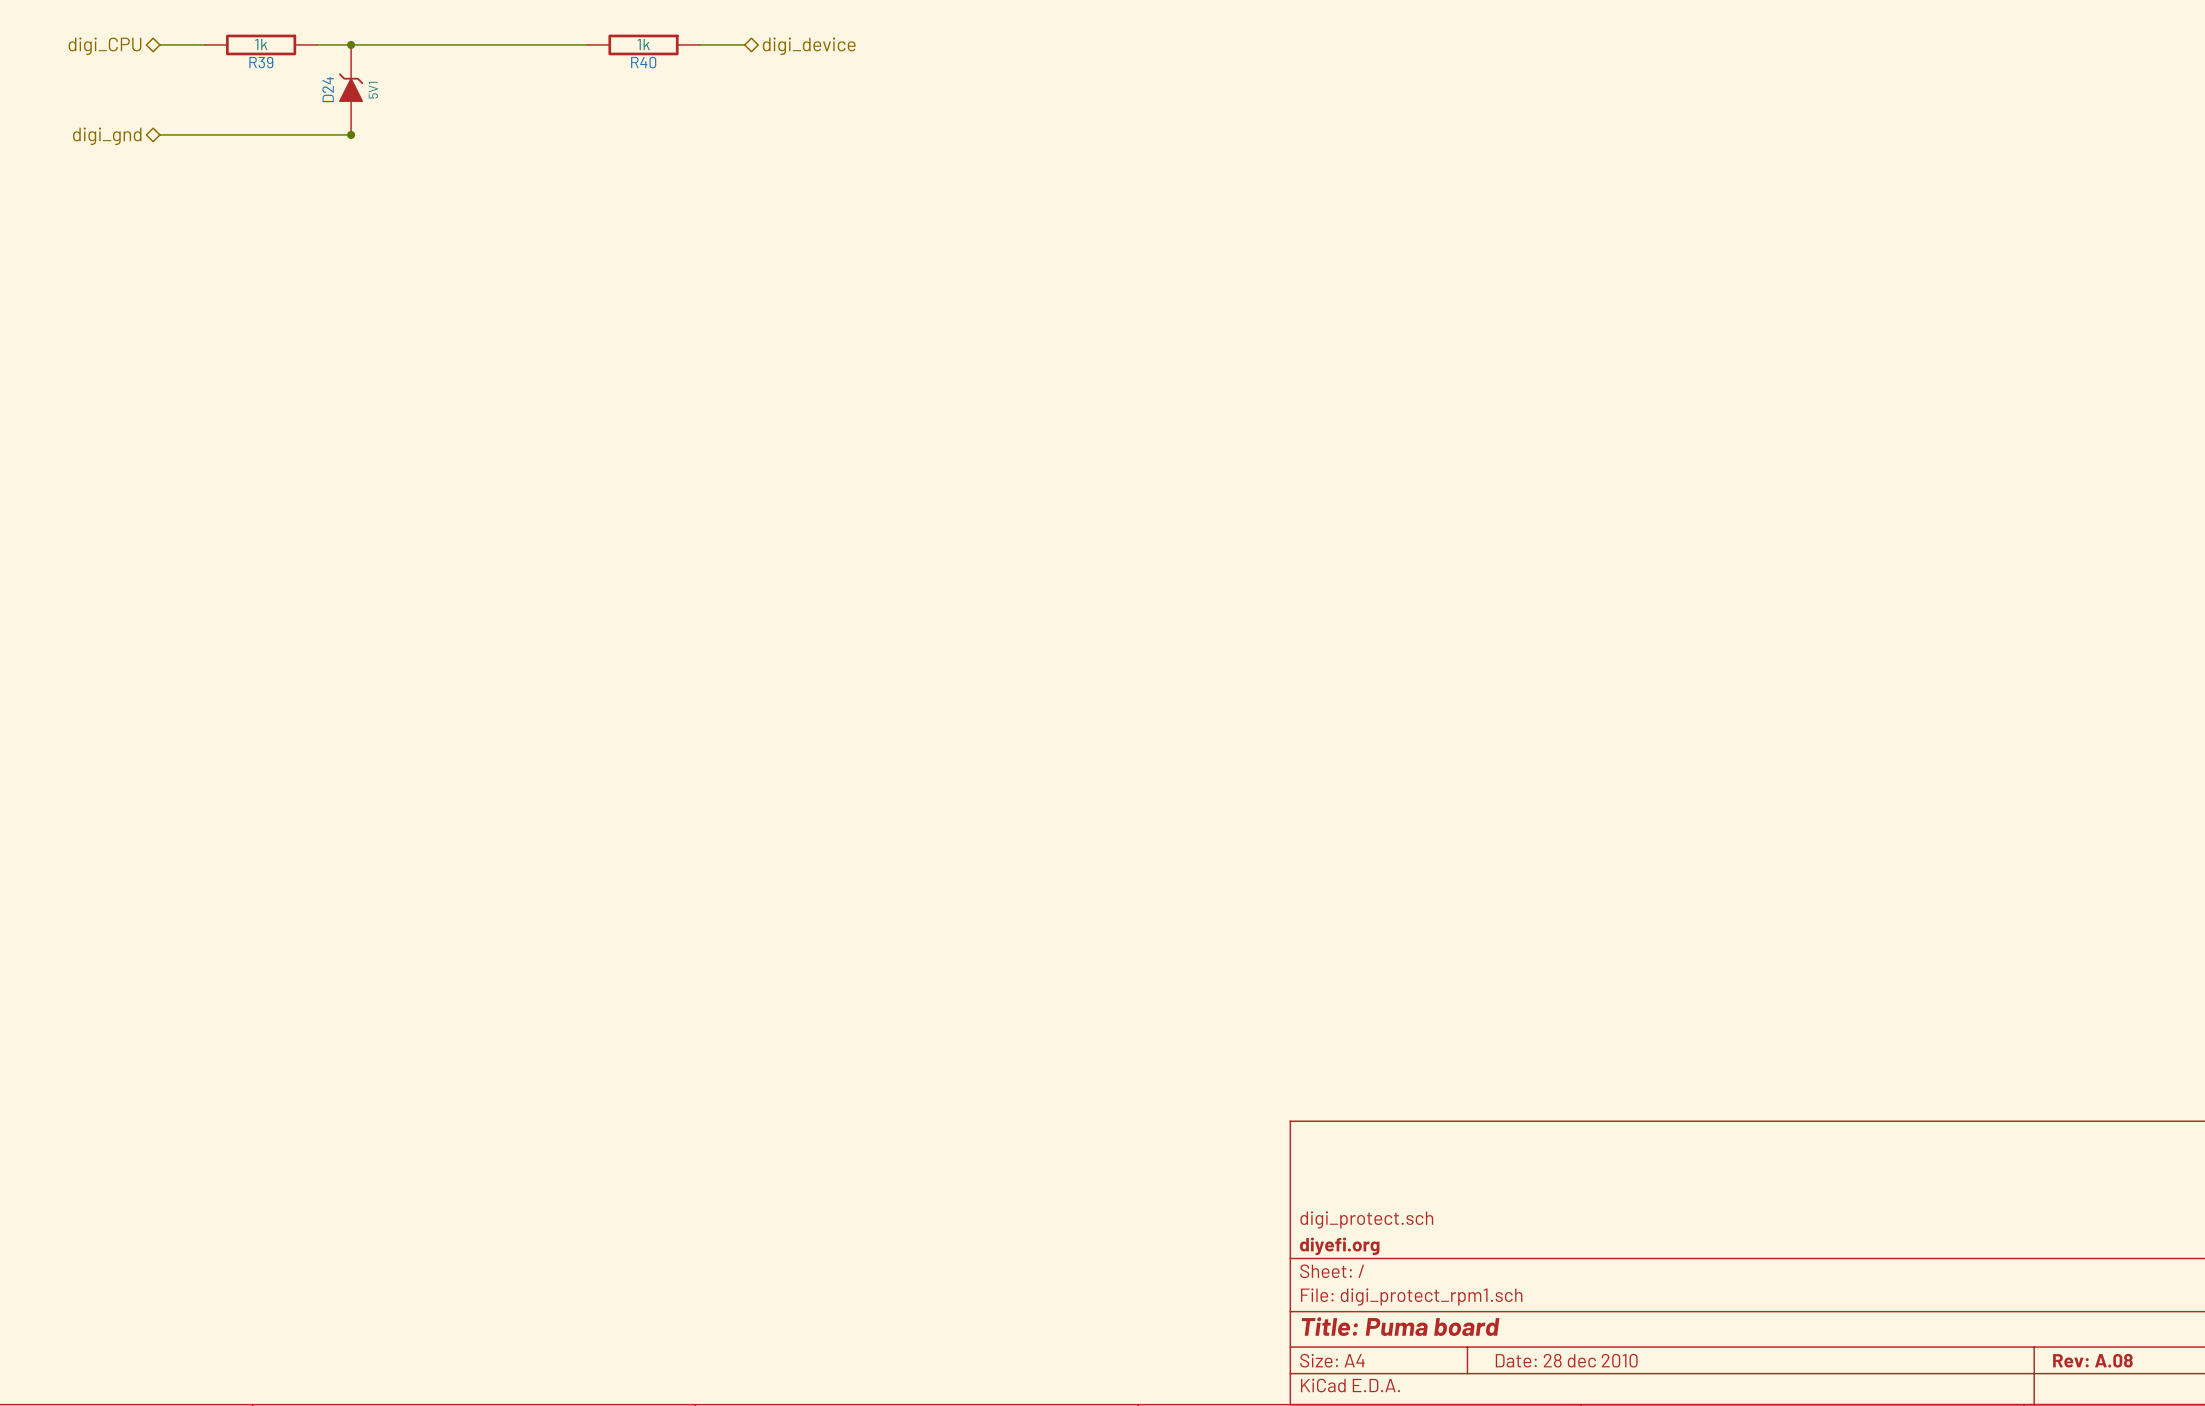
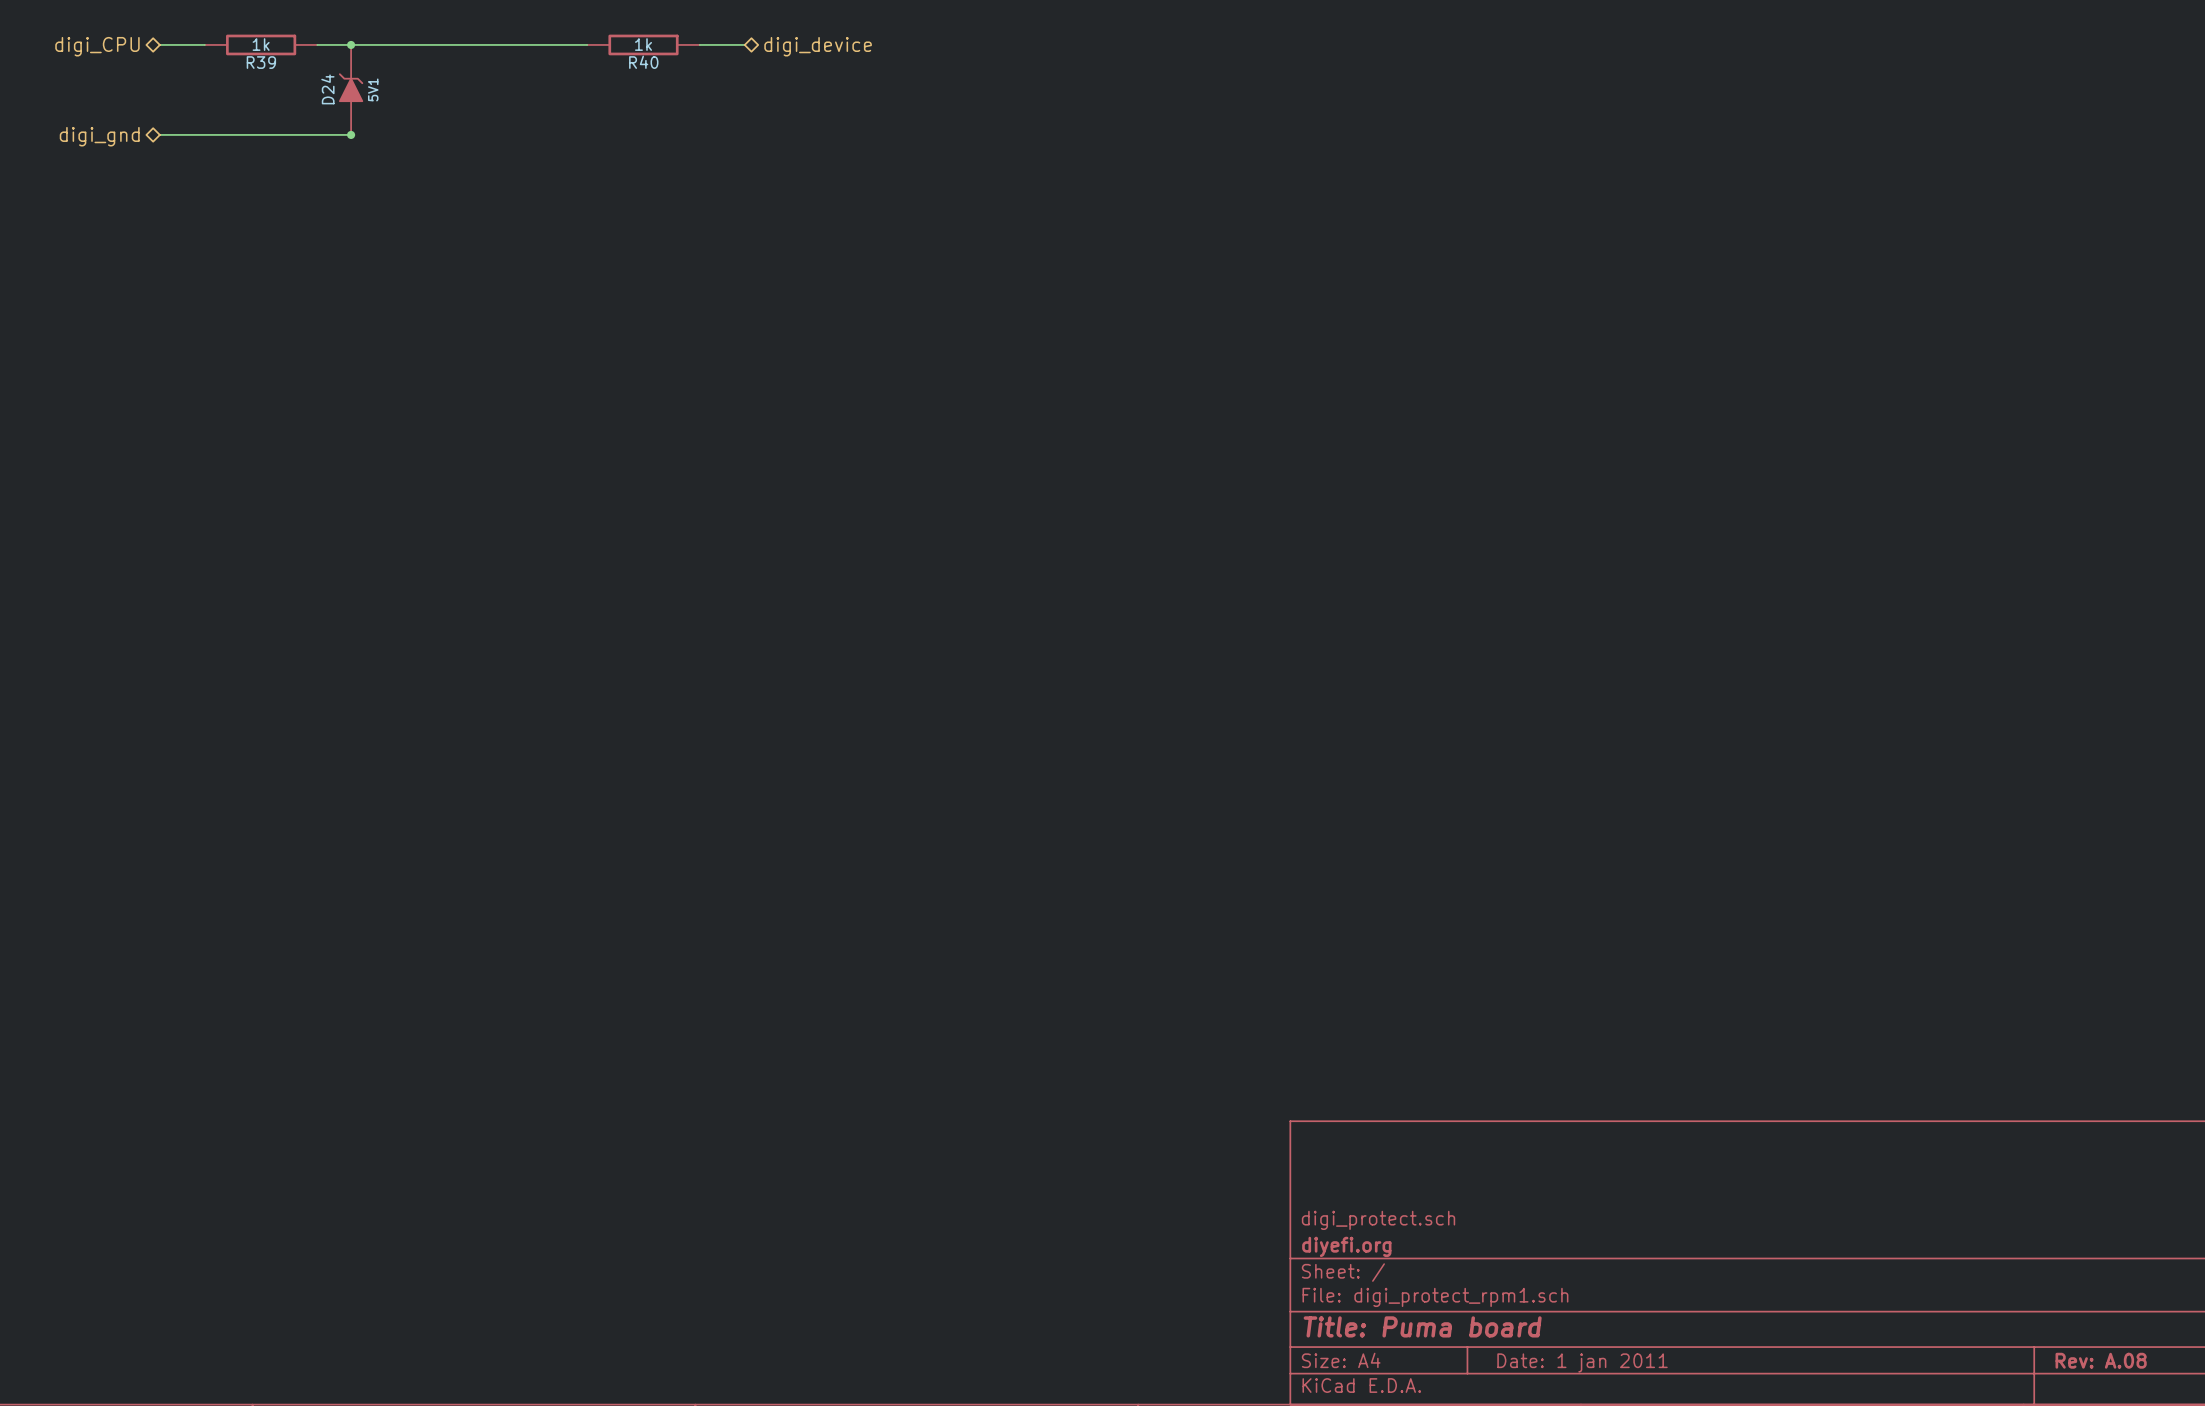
title block: Date: 28 dec 2010 (1566, 1360) -> Date: 1 jan 2011 (1582, 1362)

